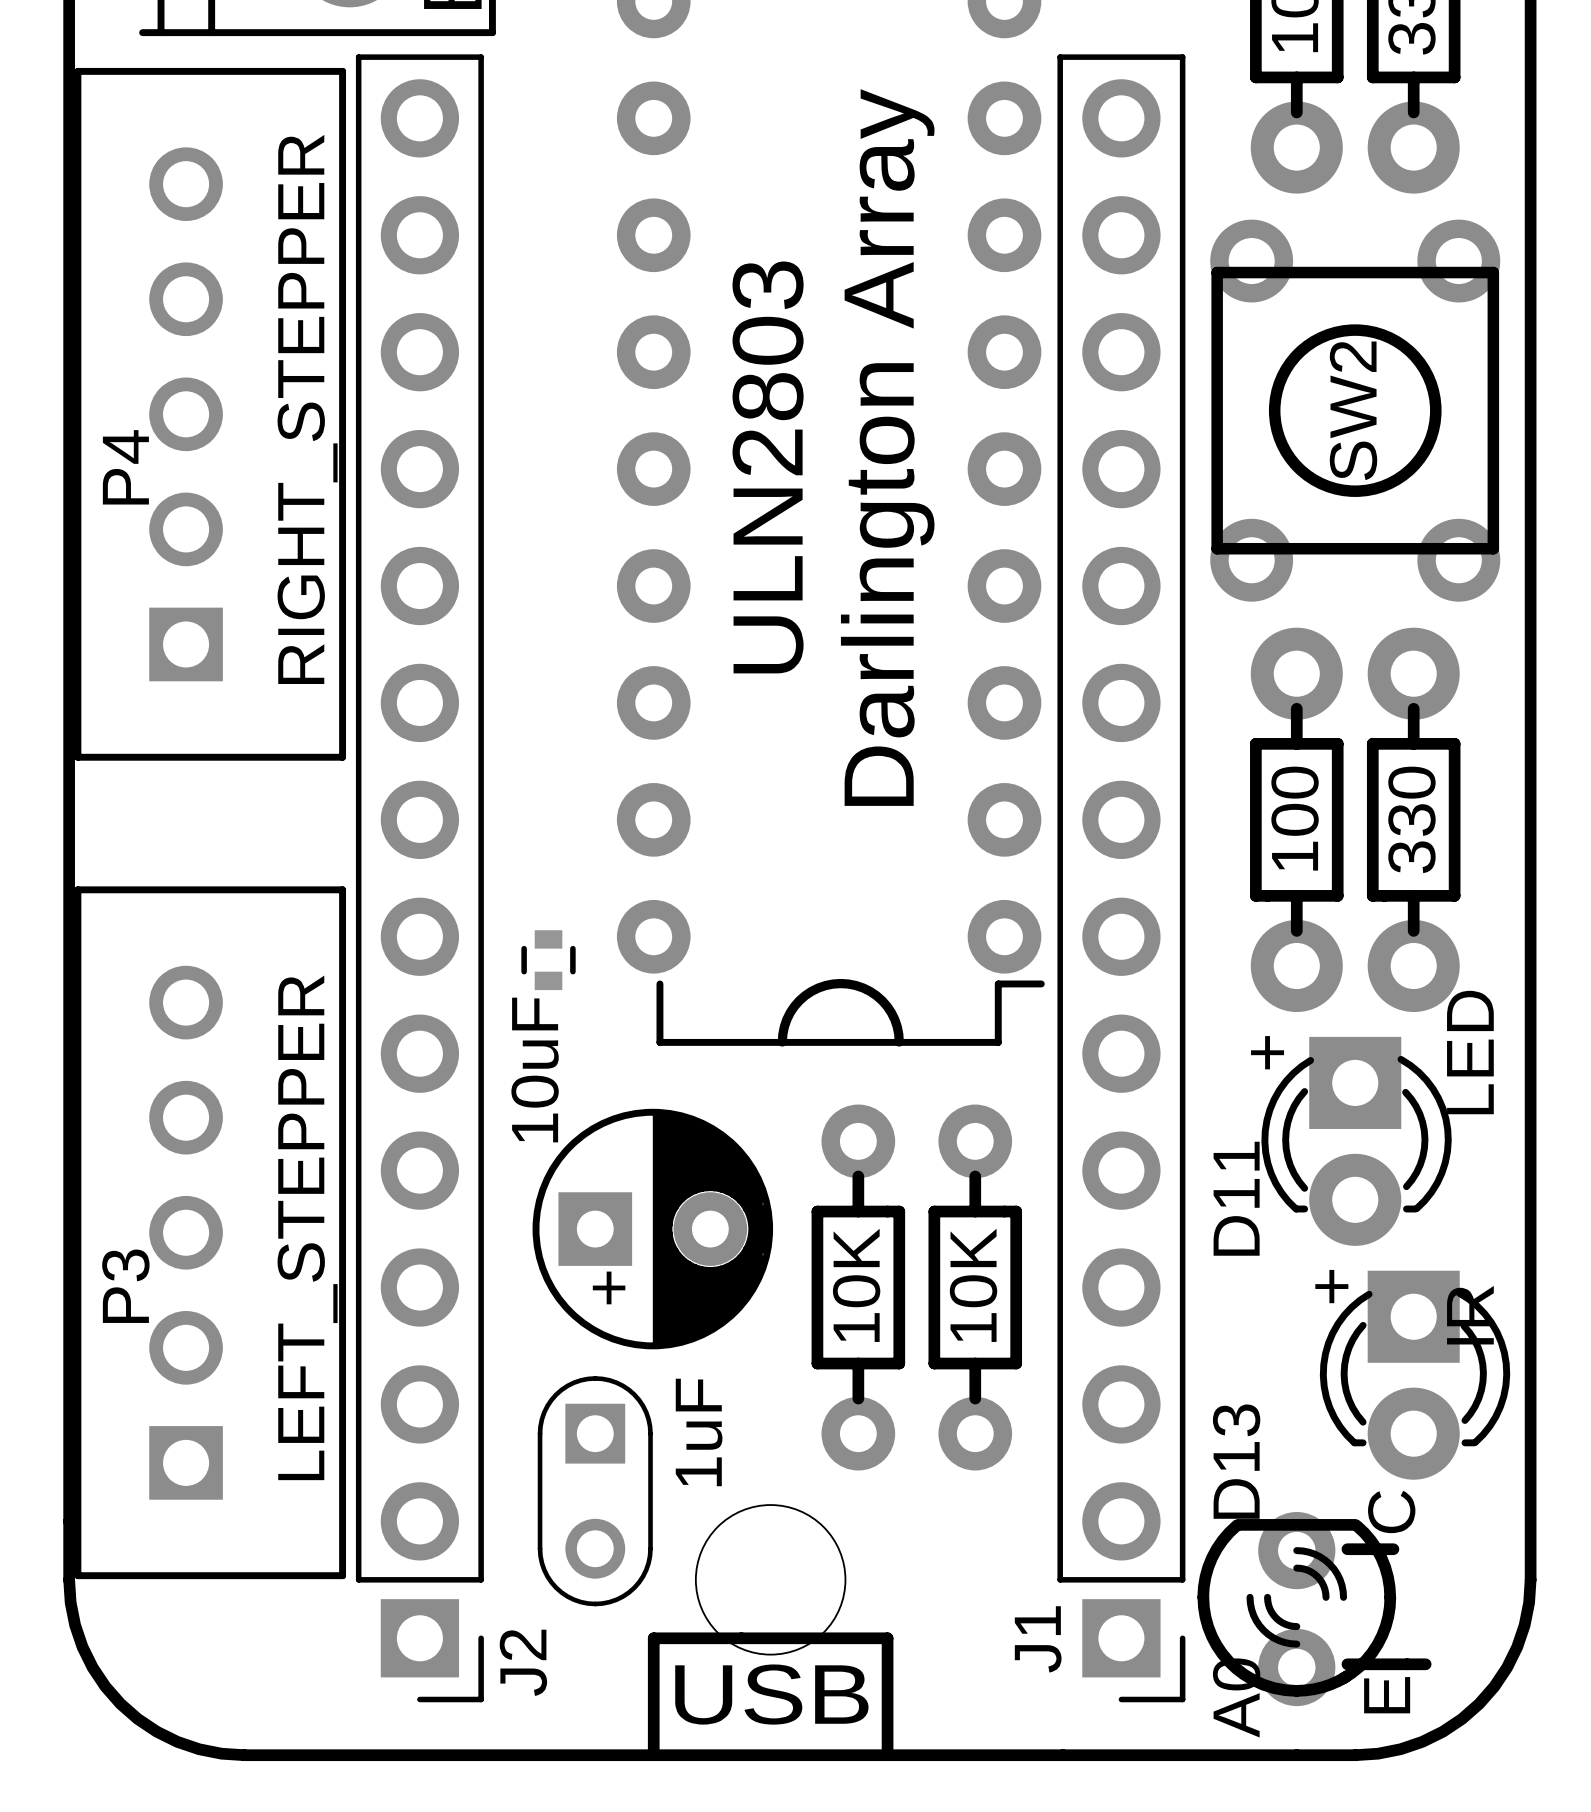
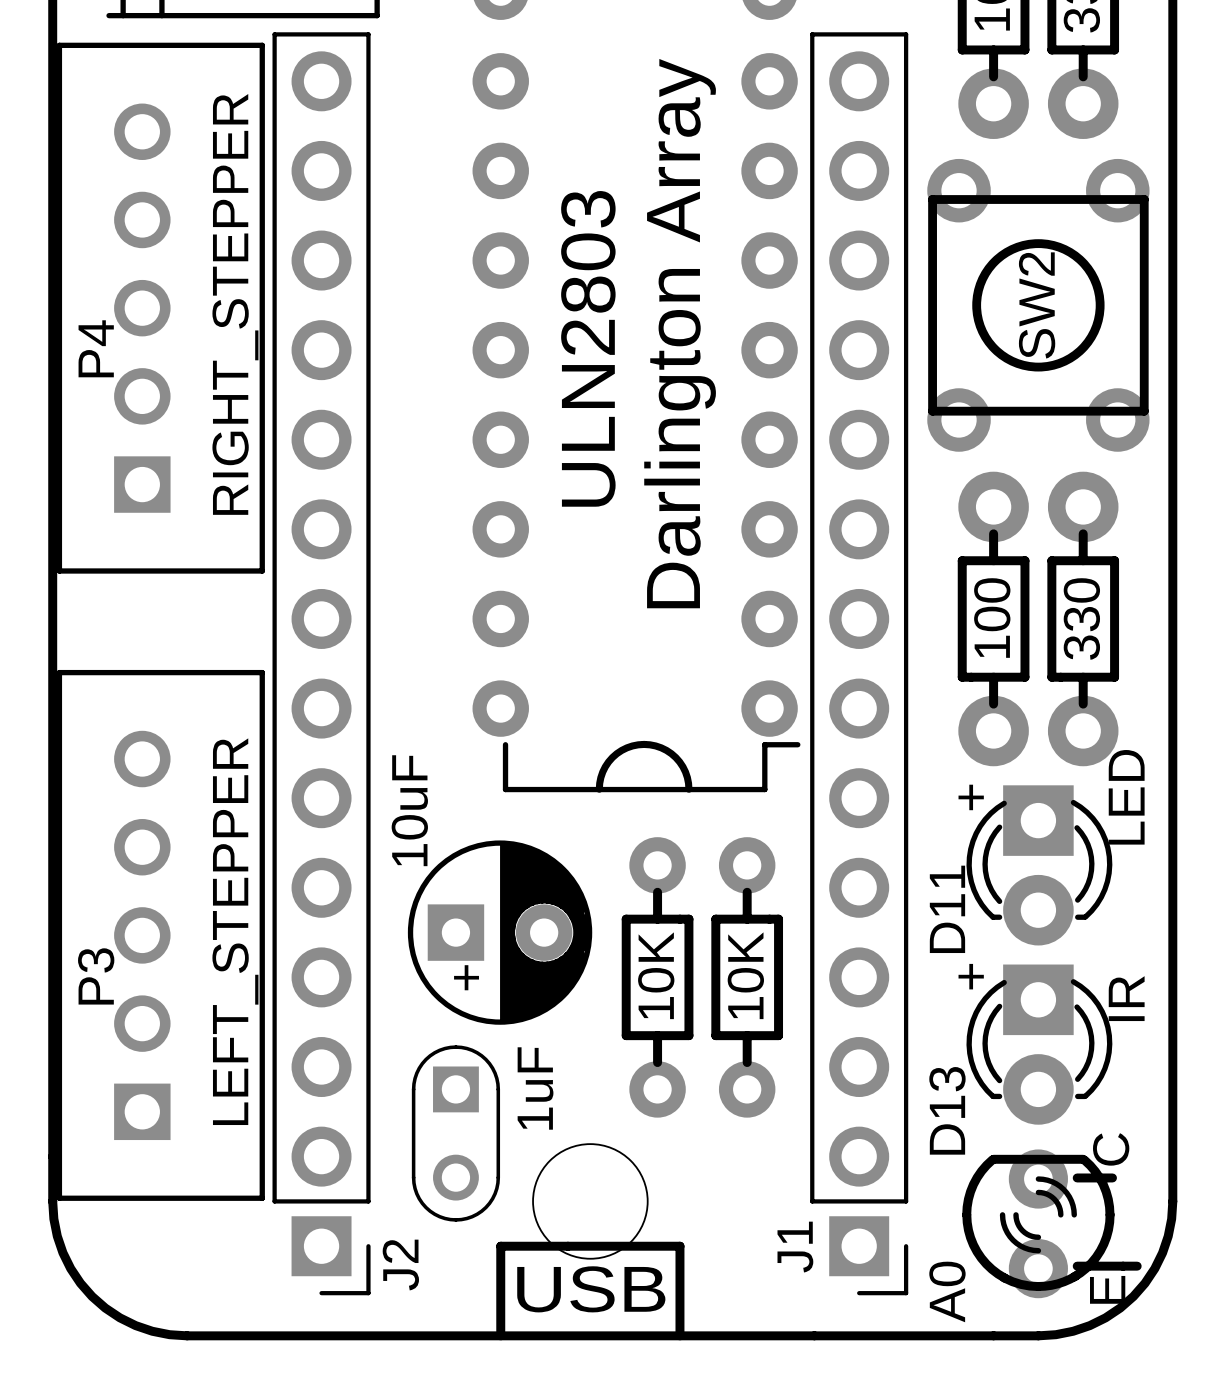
part: (548, 960) -> none
text position: + (1331, 1286) -> + (971, 976)
part position: (1415, 1375) -> (1039, 1044)
part position: (1314, 1609) -> (1051, 1223)

